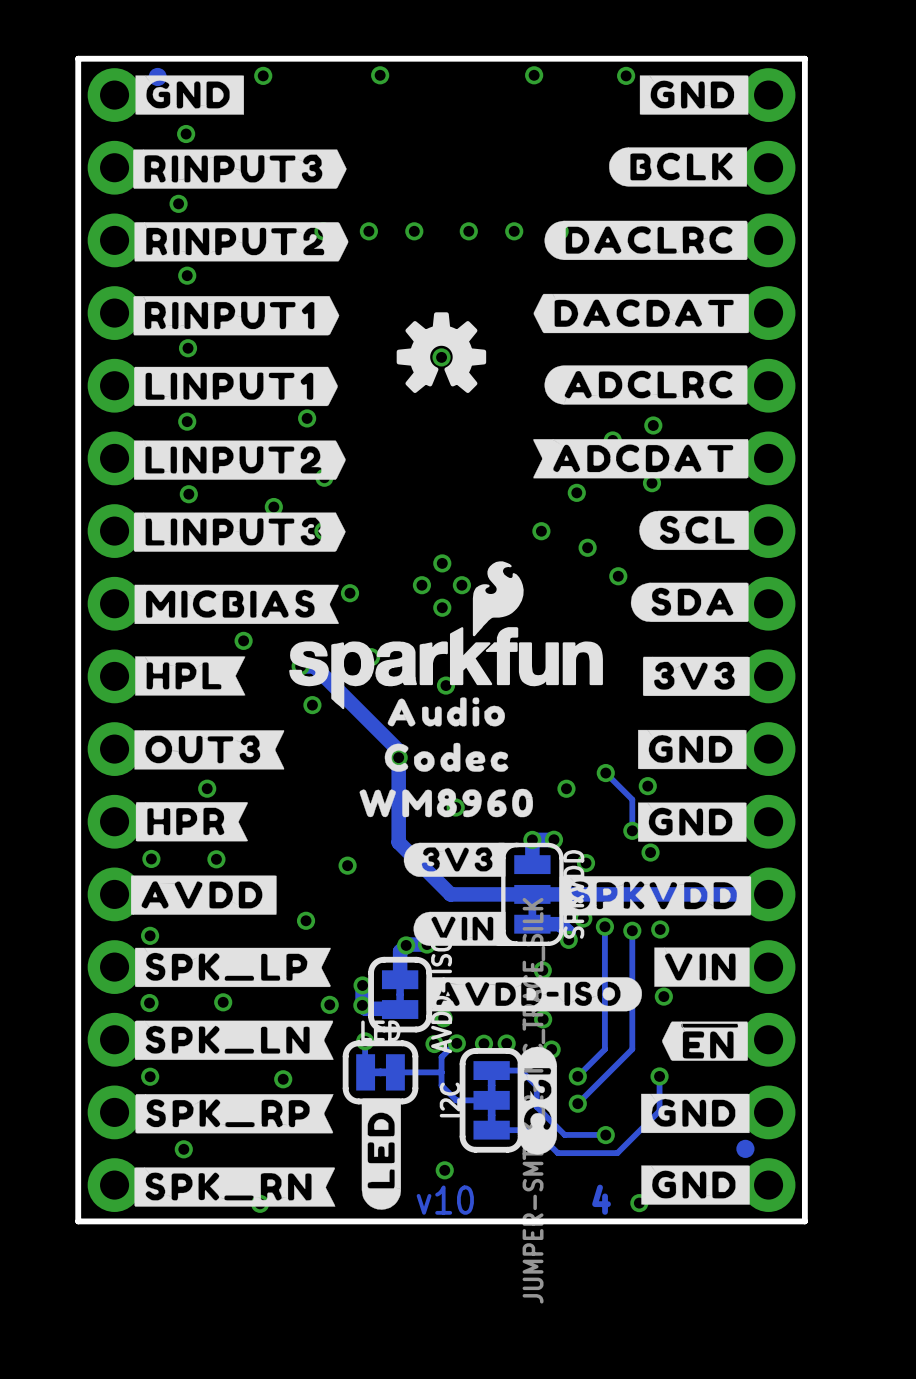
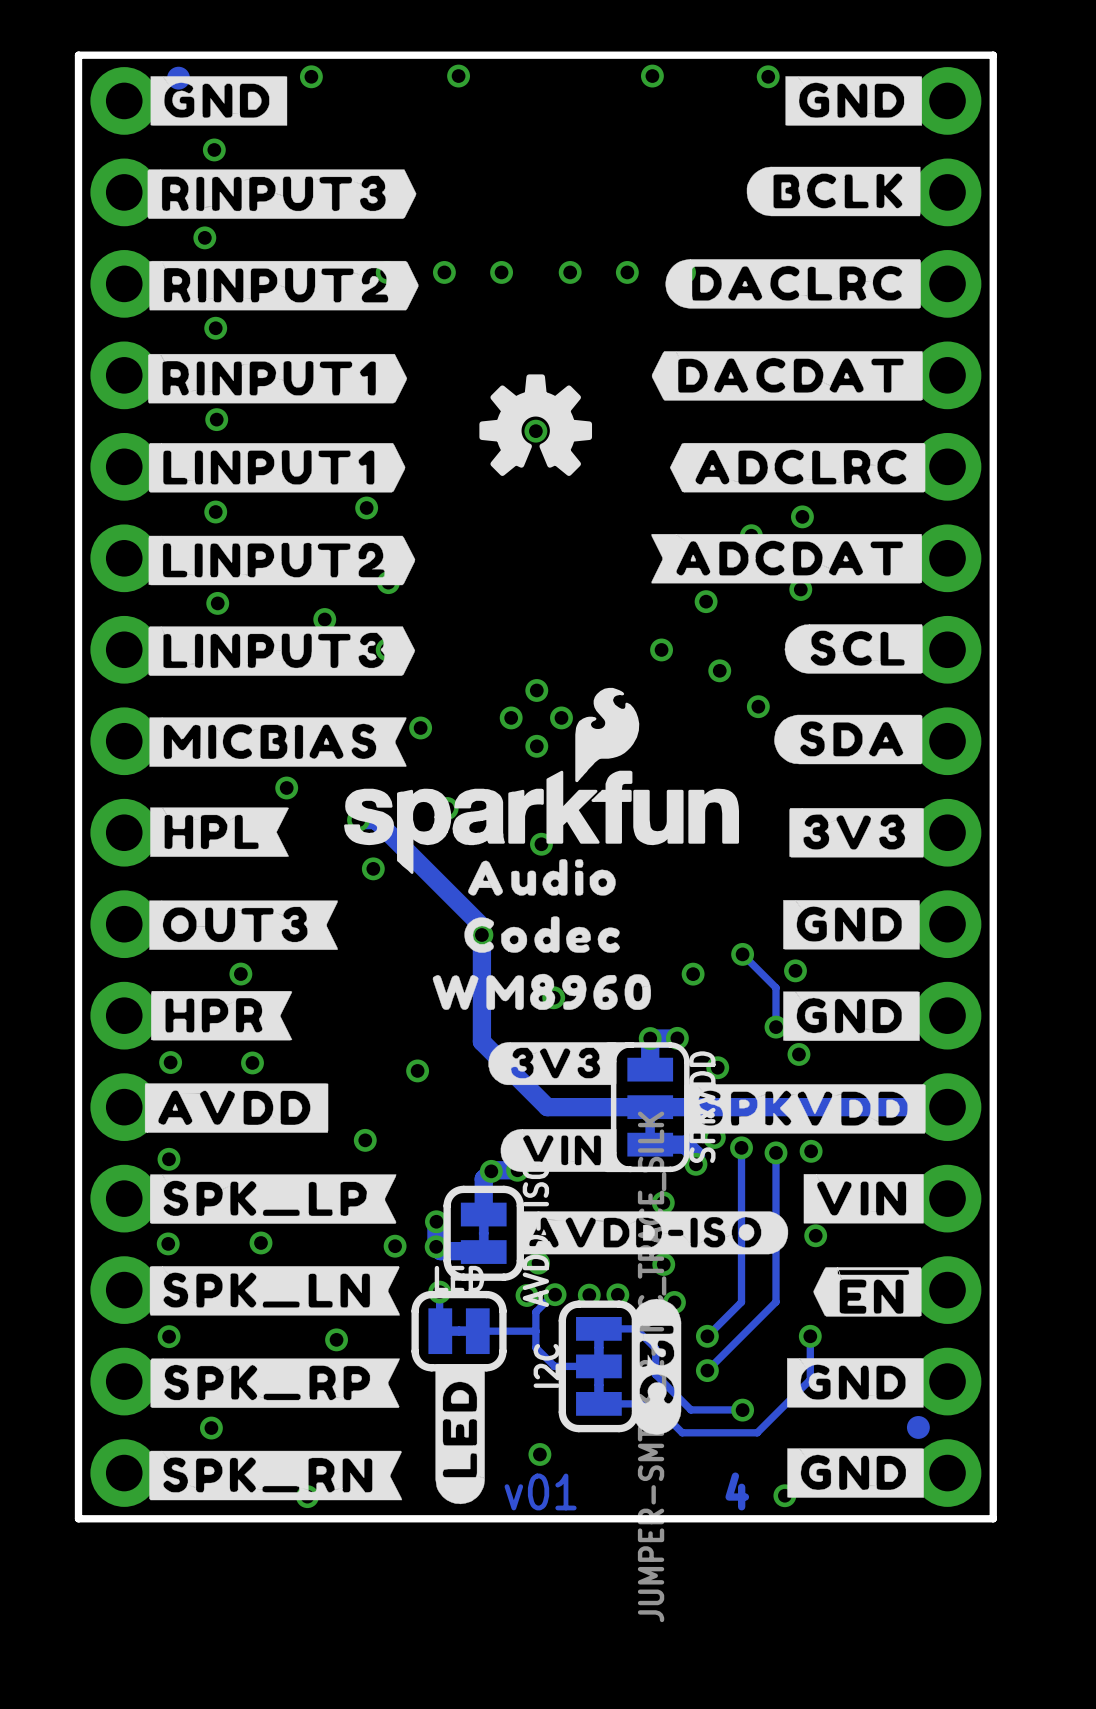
drawing shape: [544, 365, 748, 405] -> [669, 442, 926, 493]
text: v10 (445, 1200) -> v01 (540, 1491)

